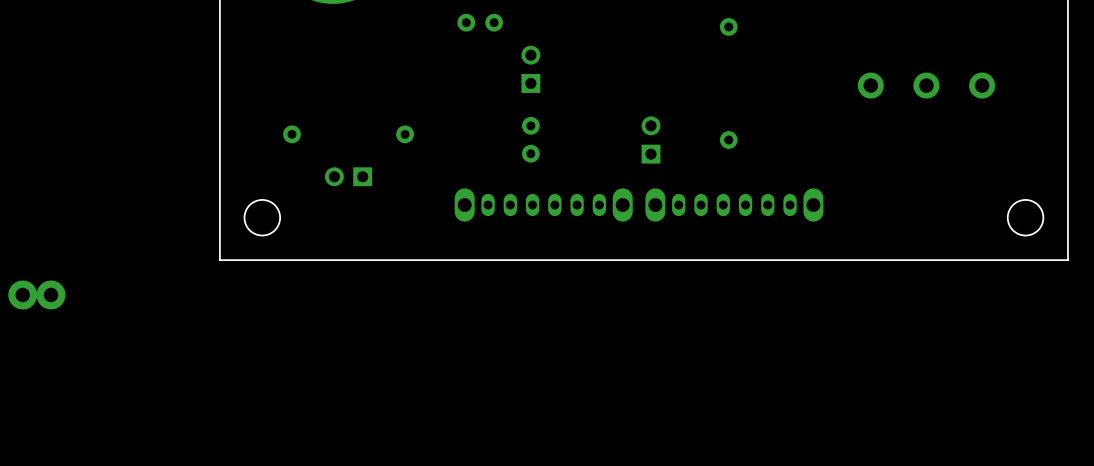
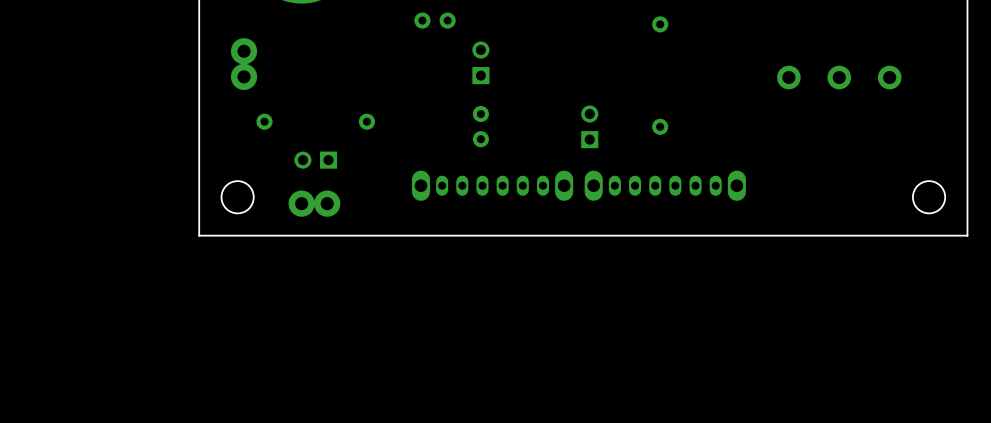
part: none -> (244, 64)
part: none -> (314, 203)
part: (36, 294) -> none

